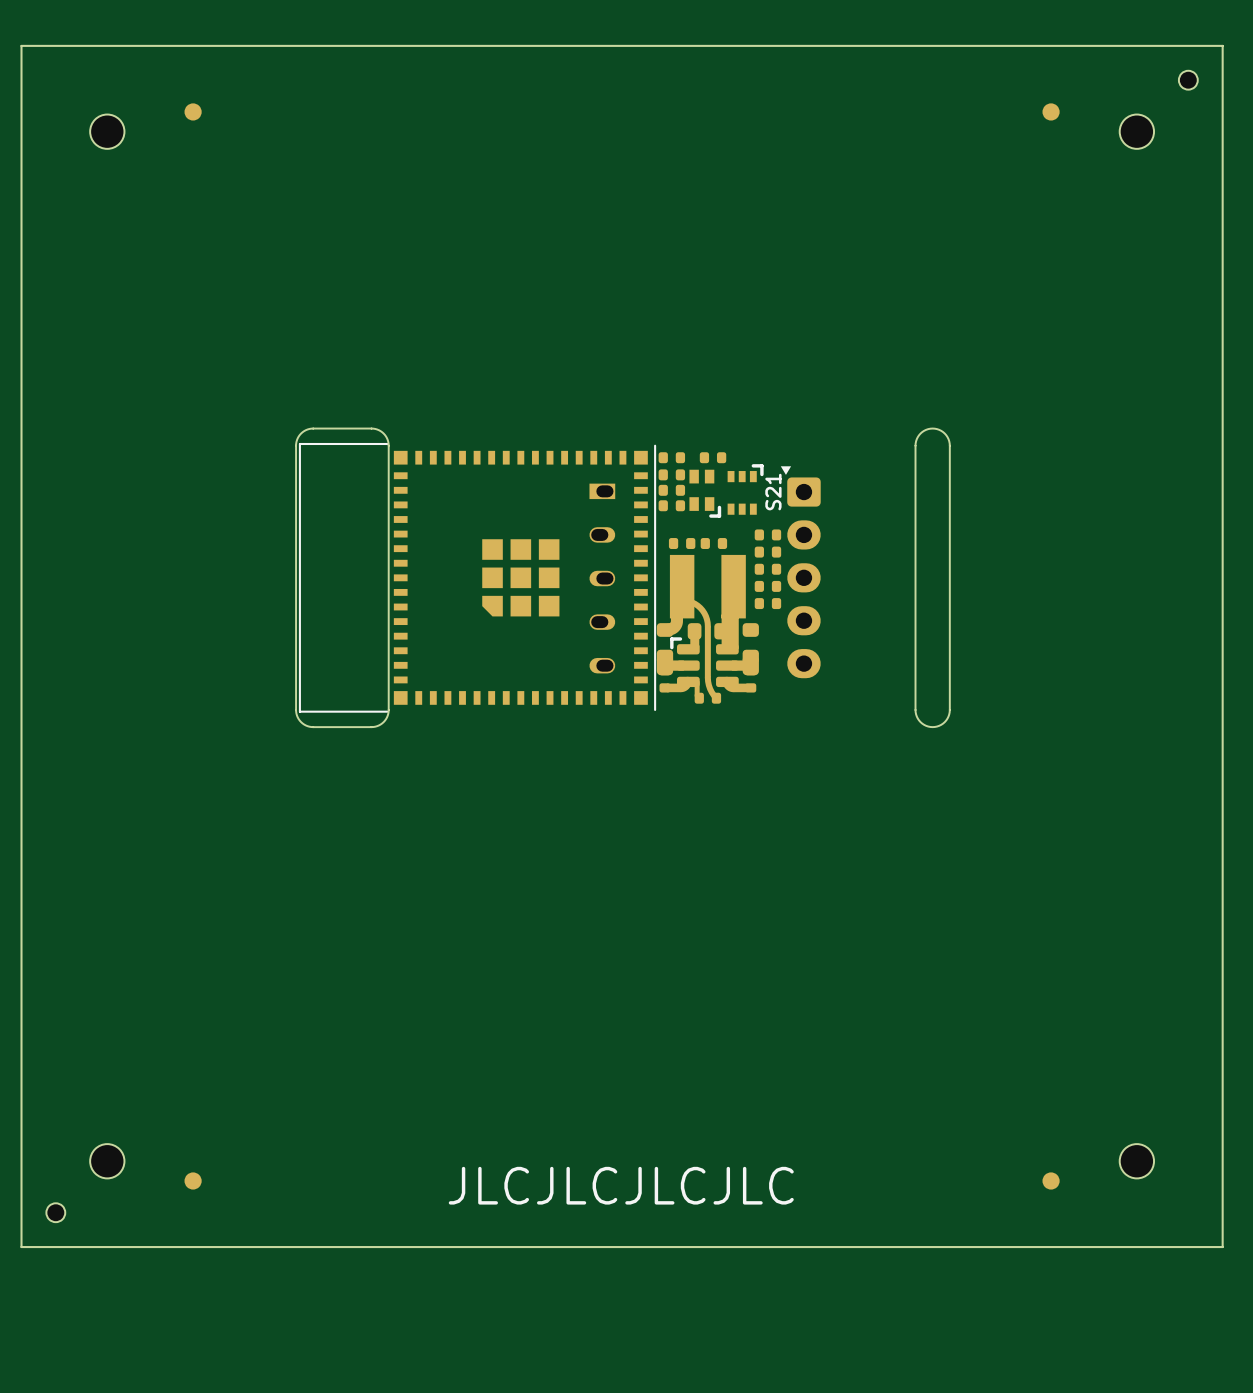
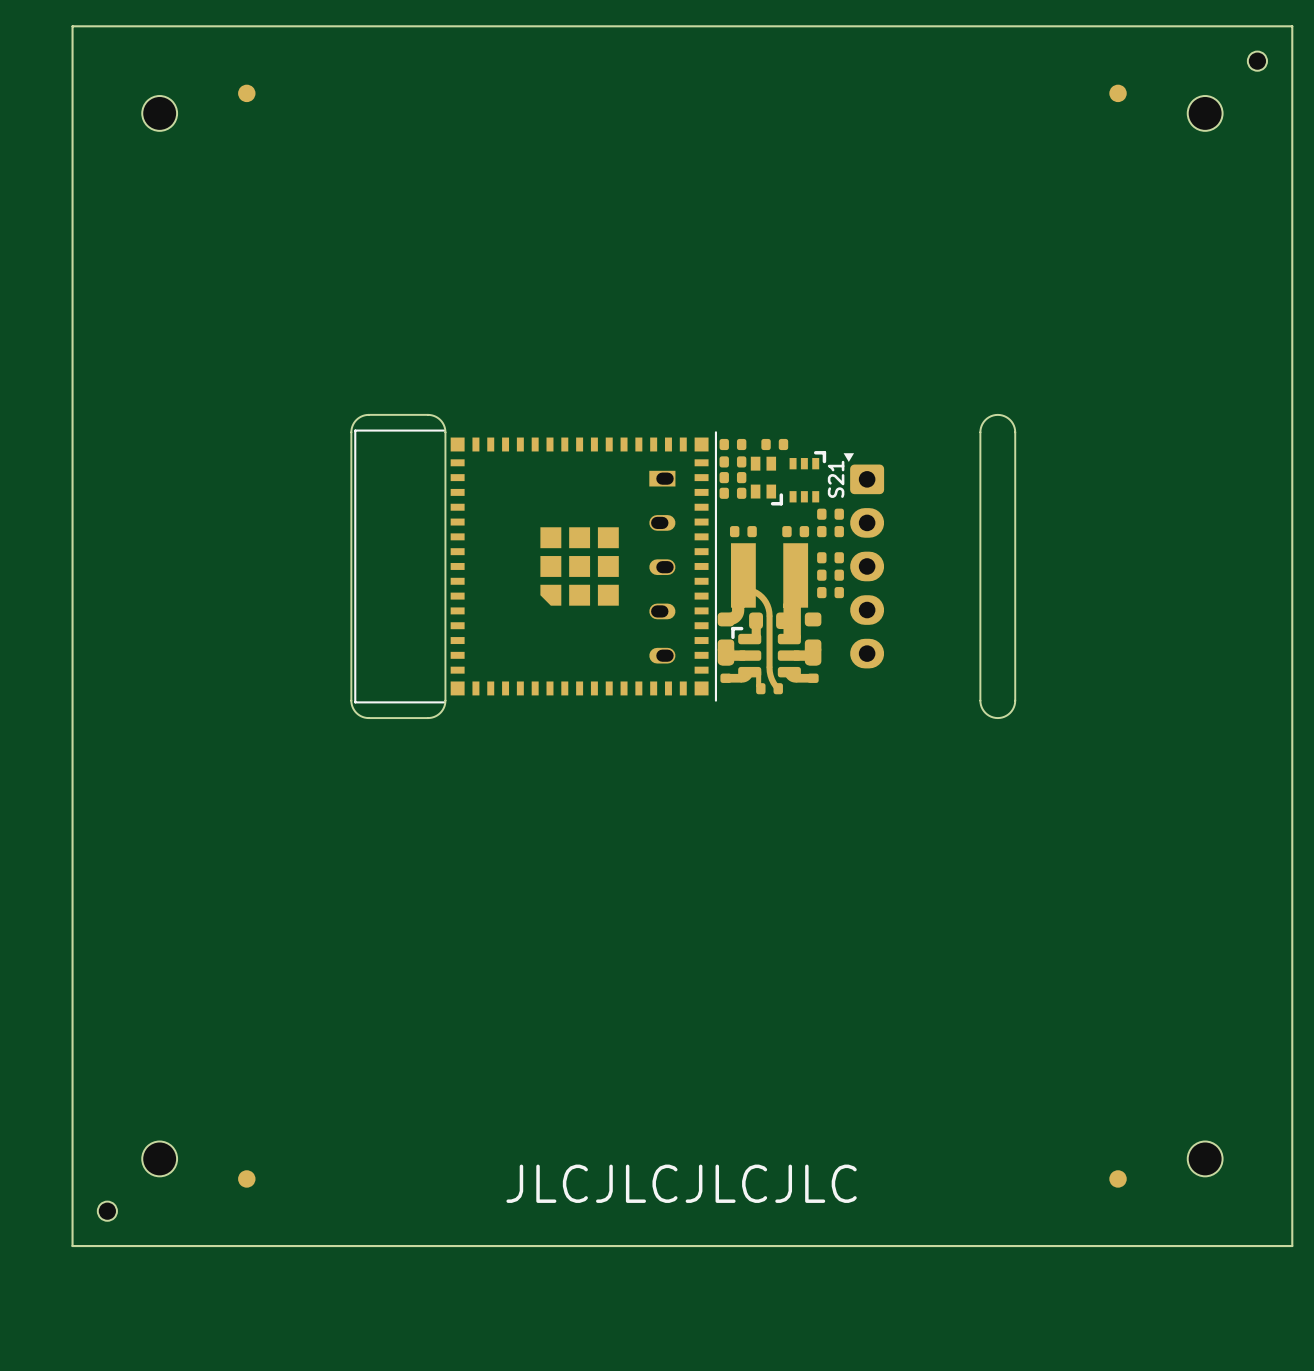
part: none -> (830, 514)
part: (767, 534) -> none
part: (713, 543) -> none
part: none -> (795, 531)
part: none -> (830, 531)
part: (767, 552) -> none

